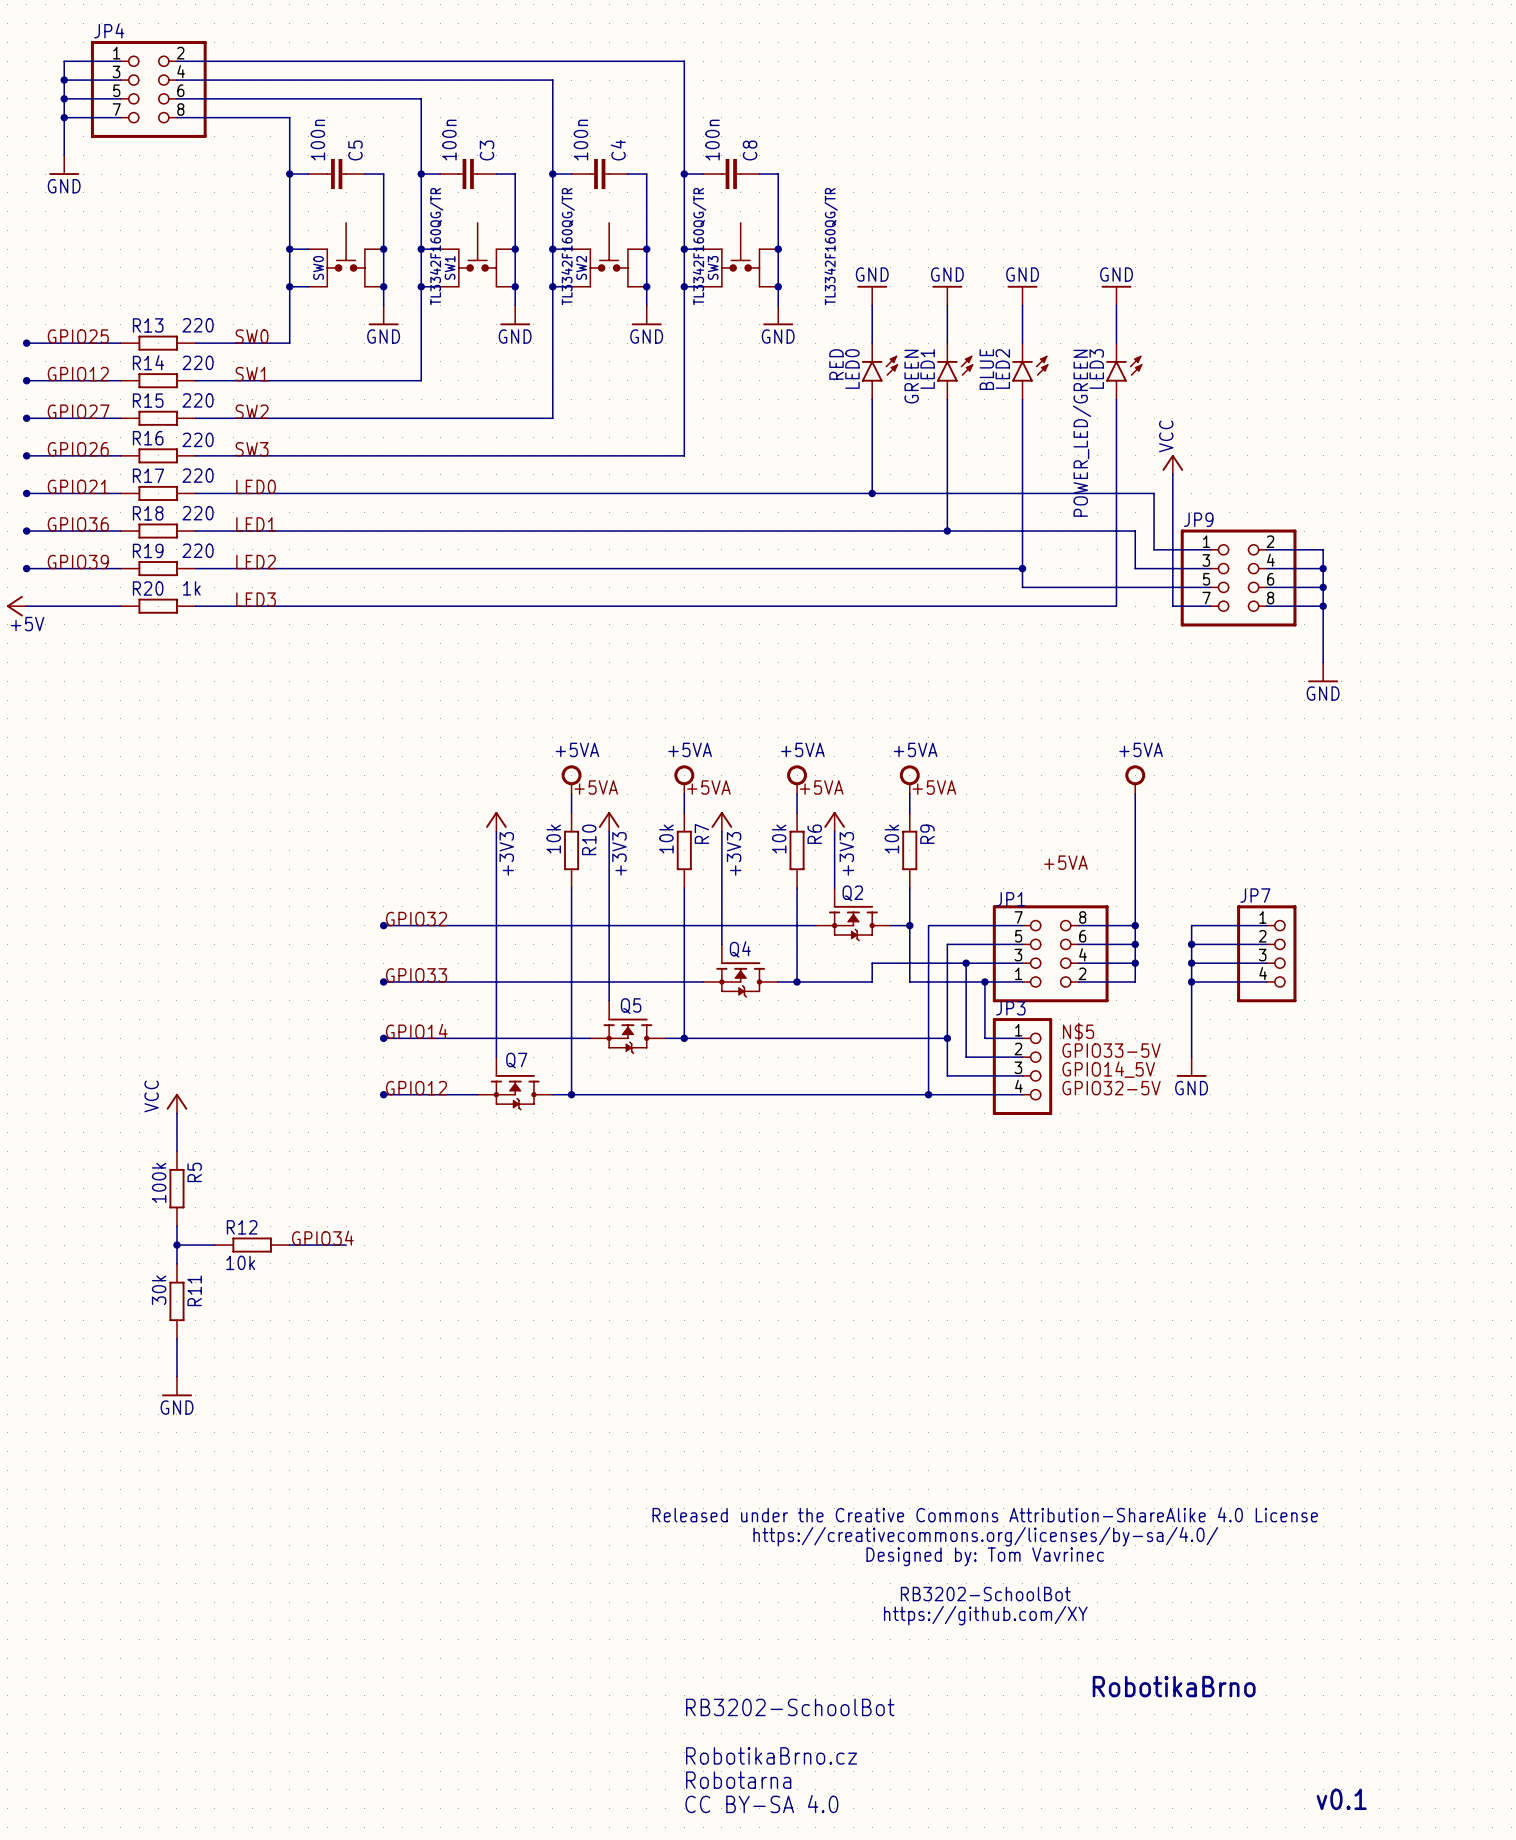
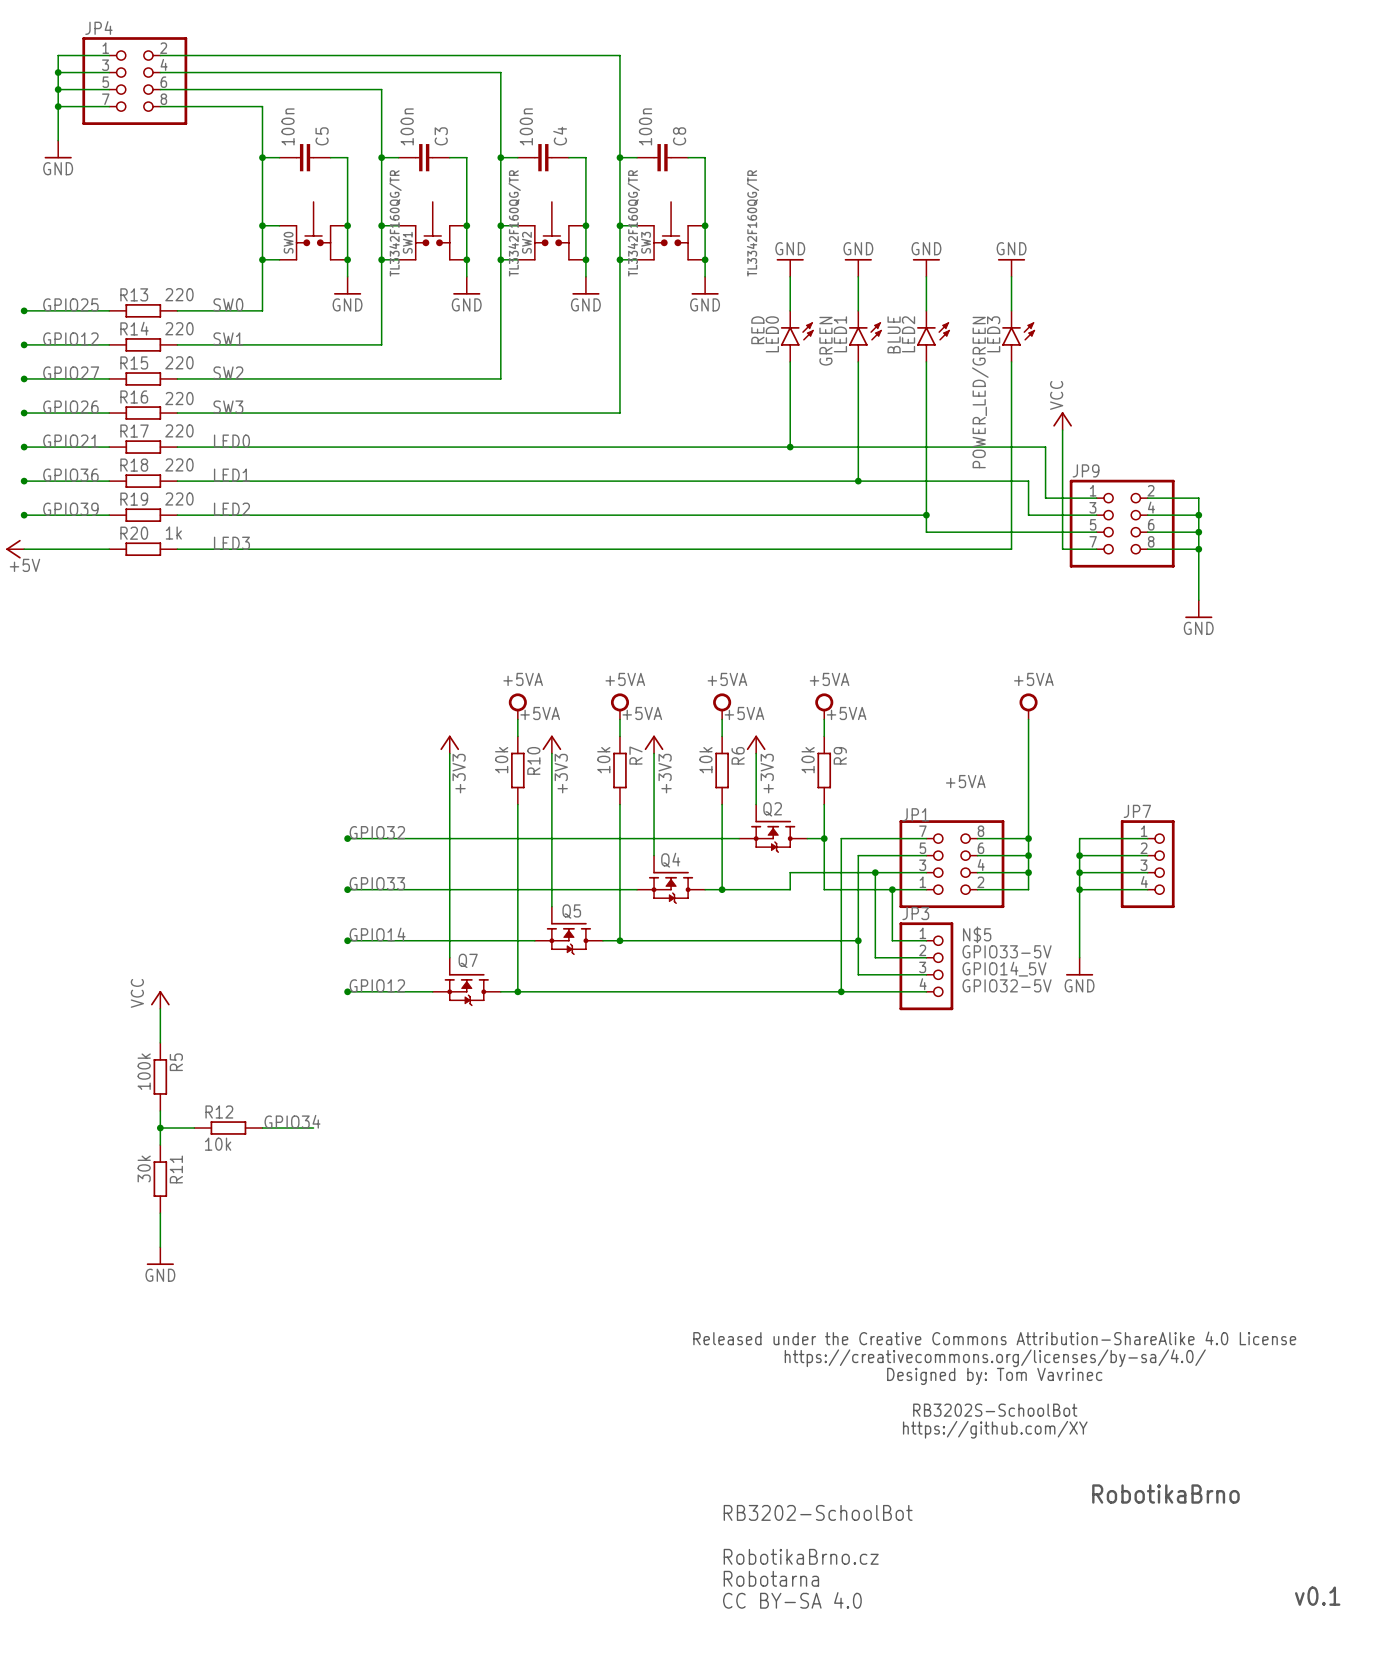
text position: Released under the Creative Commons Attribution-ShareAlike 4.0 License (985, 1514) -> Released under the Creative Commons Attribution-ShareAlike 4.0 License (994, 1338)
text position: https://creativecommons.org/licenses/by-sa/4.0/ (985, 1536) -> https://creativecommons.org/licenses/by-sa/4.0/ (995, 1358)
text position: Designed by: Tom Vavrinec (985, 1556) -> Designed by: Tom Vavrinec (994, 1376)
text: none -> RB3202S-SchoolBot (995, 1410)
text: RB3202-SchoolBot (985, 1594) -> none
text position: https://github.com/XY (985, 1615) -> https://github.com/XY (995, 1429)
text: none -> RB3202-SchoolBot (818, 1512)
text position: RobotikaBrno (1174, 1686) -> RobotikaBrno (1165, 1494)
text: RB3202-SchoolBot (790, 1707) -> none
text position: RobotikaBrno.cz (771, 1755) -> RobotikaBrno.cz (801, 1556)
text position: Robotarna (738, 1780) -> Robotarna (771, 1578)
text position: v0.1 (1341, 1799) -> v0.1 (1317, 1596)
text position: CC BY-SA 4.0 (761, 1804) -> CC BY-SA 4.0 (792, 1600)

